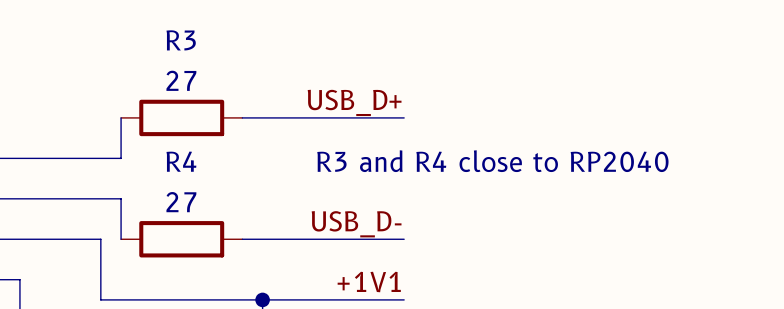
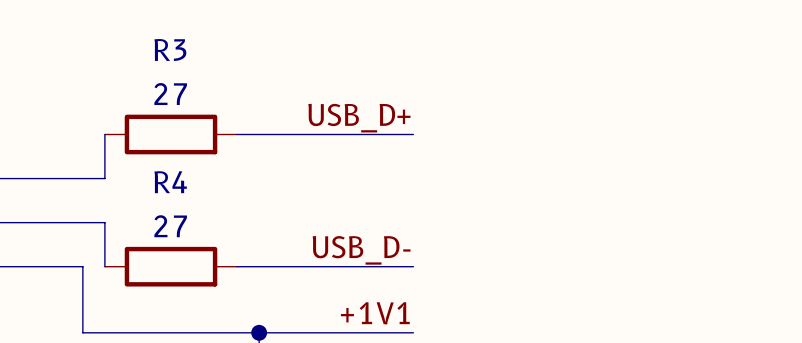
text: R3 and R4 close to RP2040 (492, 161) -> none

